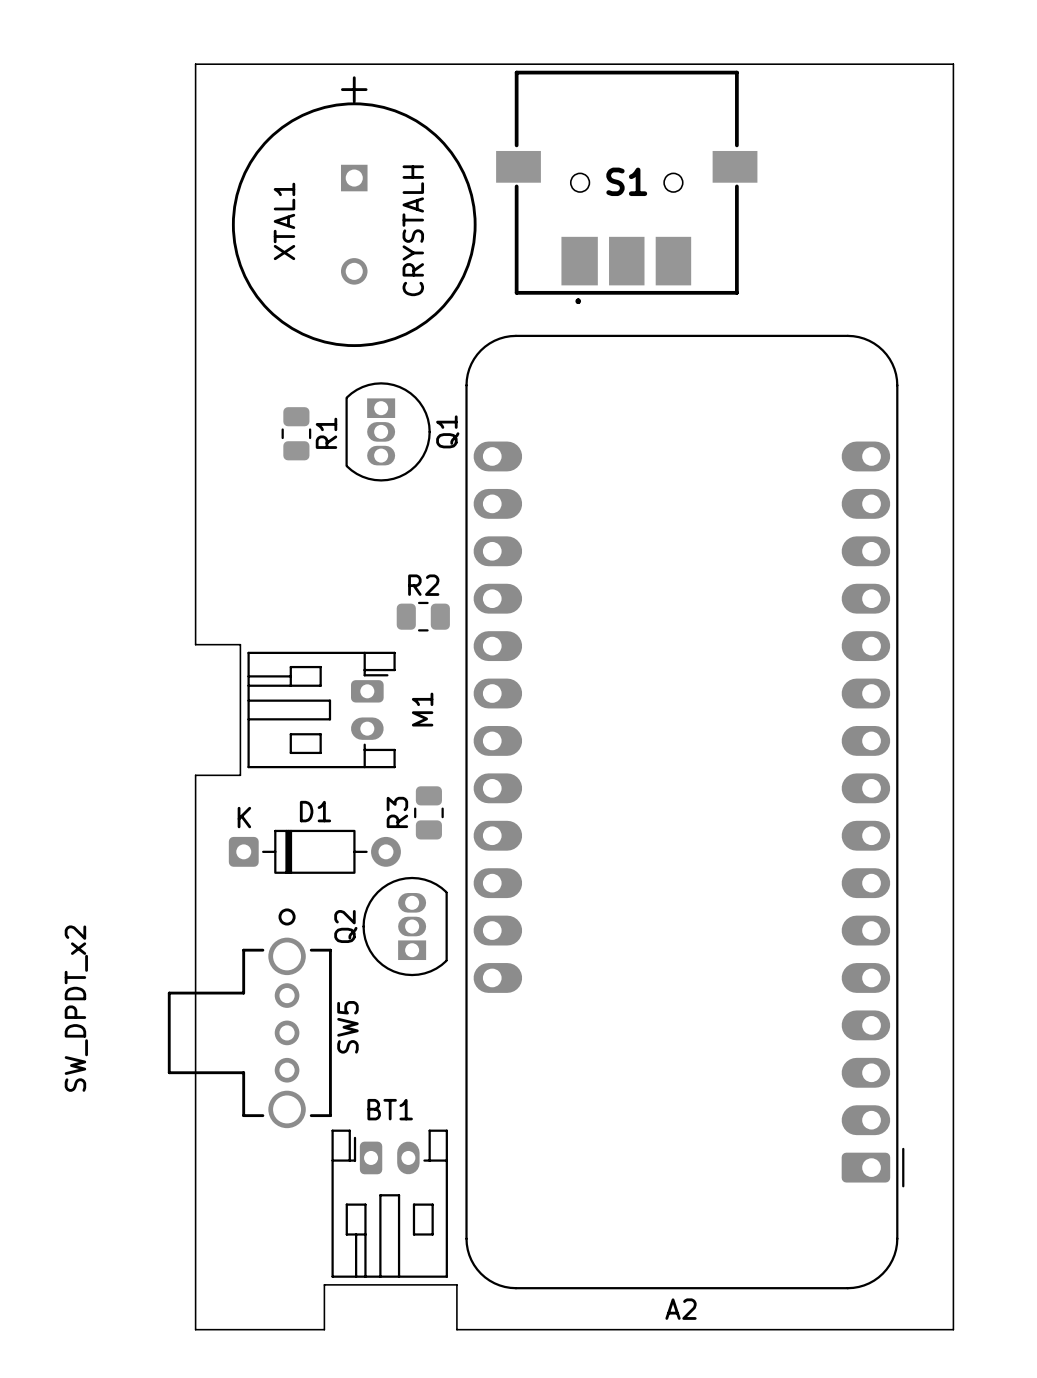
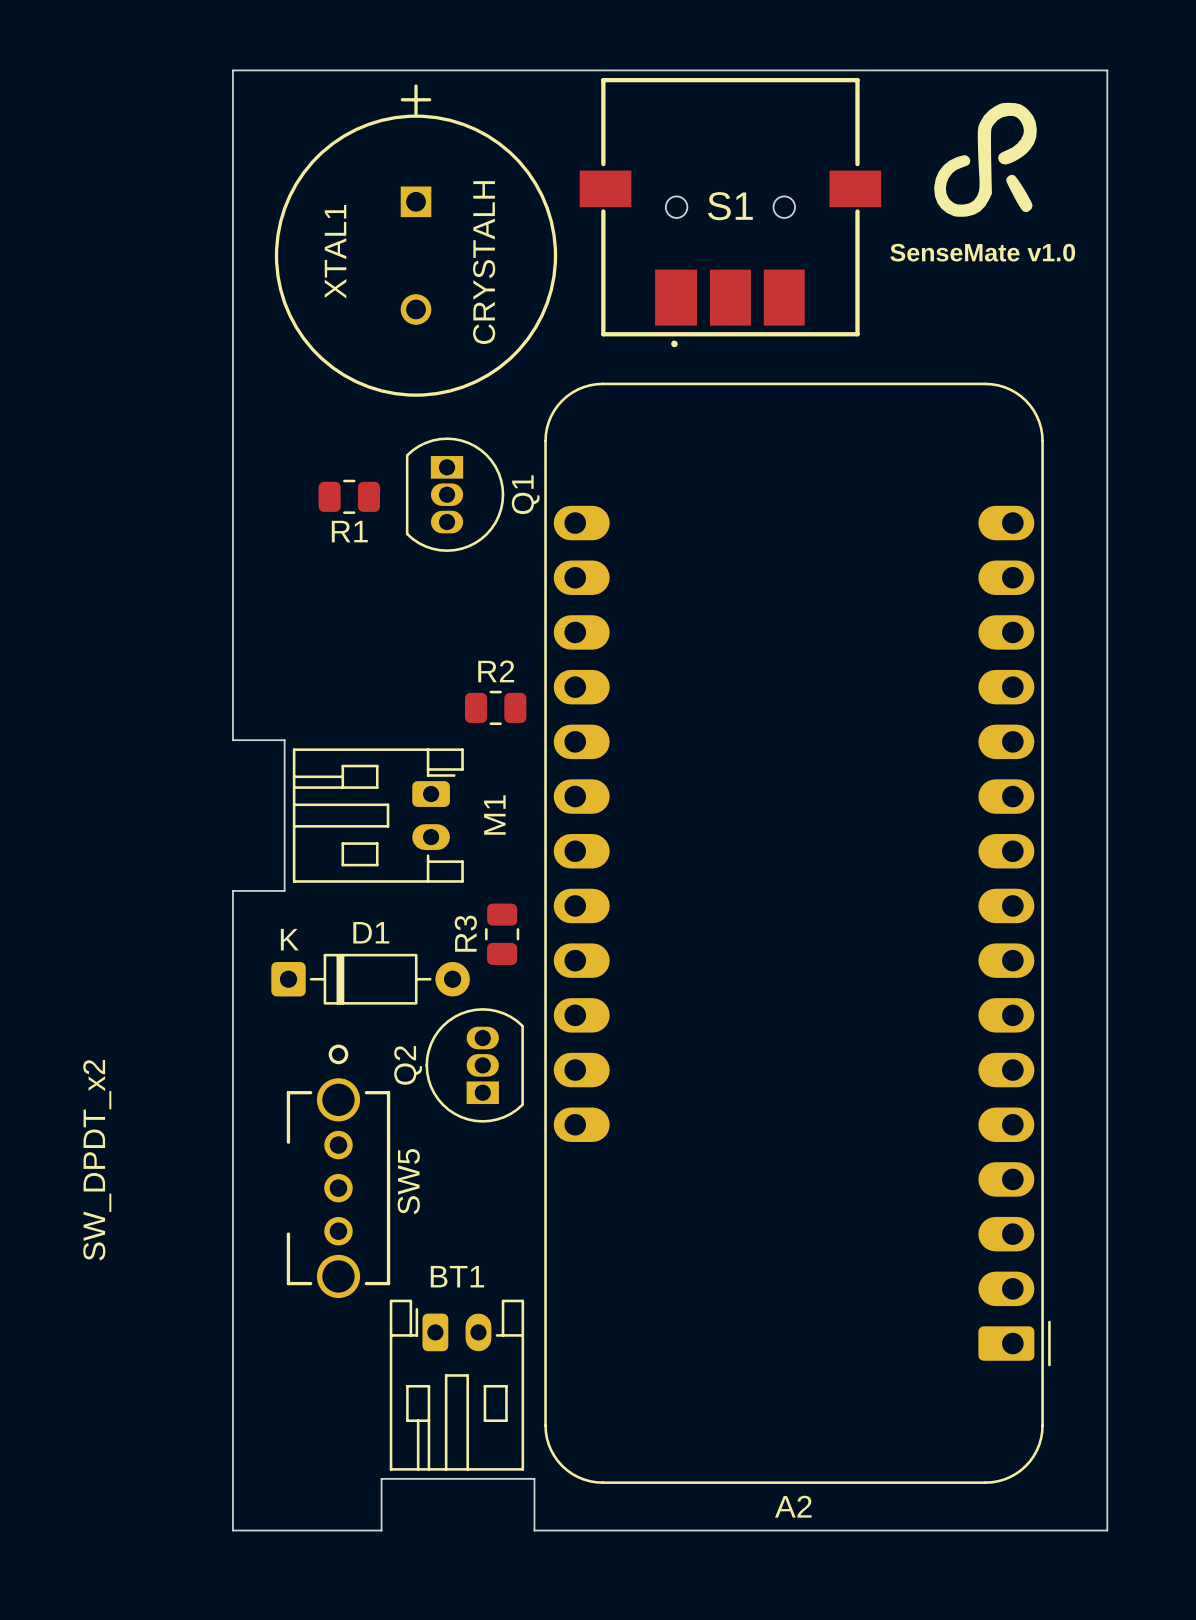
drawing: none -> [934, 102, 1037, 217]
text: none -> SenseMate v1.0 (982, 252)
R1 rotation: 0° (296, 433) -> 90° clockwise (349, 496)
SW5 footprint: [167, 908, 332, 1129] -> [286, 1044, 391, 1299]

